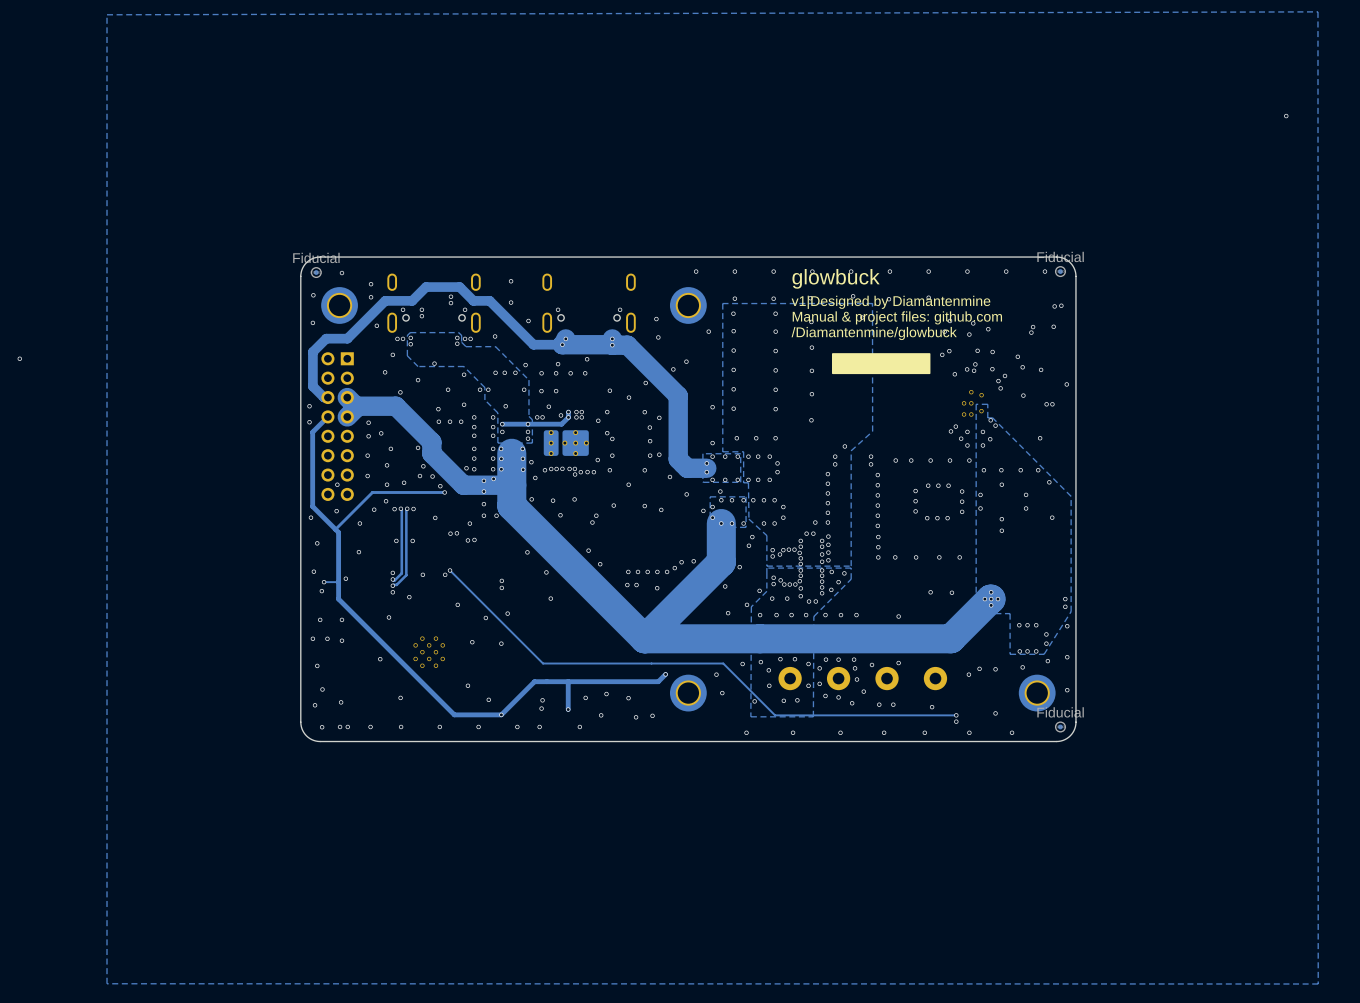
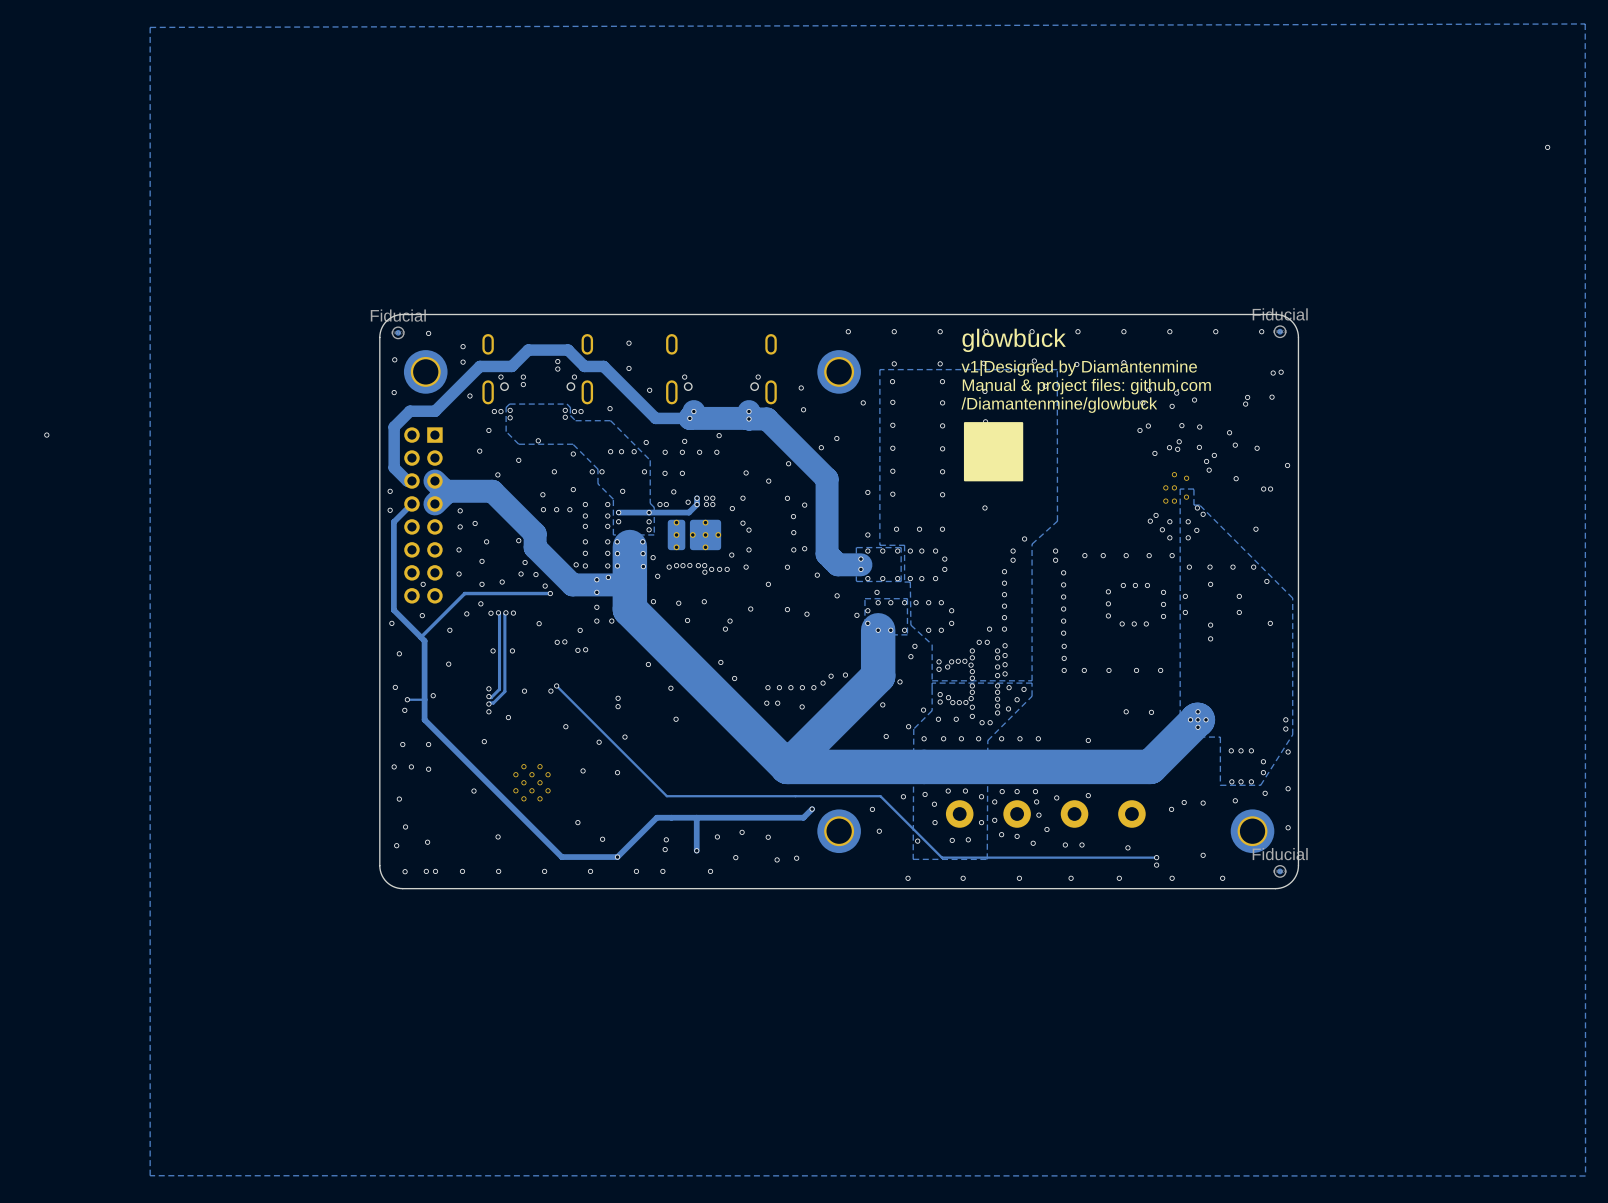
drawing: none -> [963, 422, 1024, 482]
drawing: [831, 353, 931, 375] -> none

